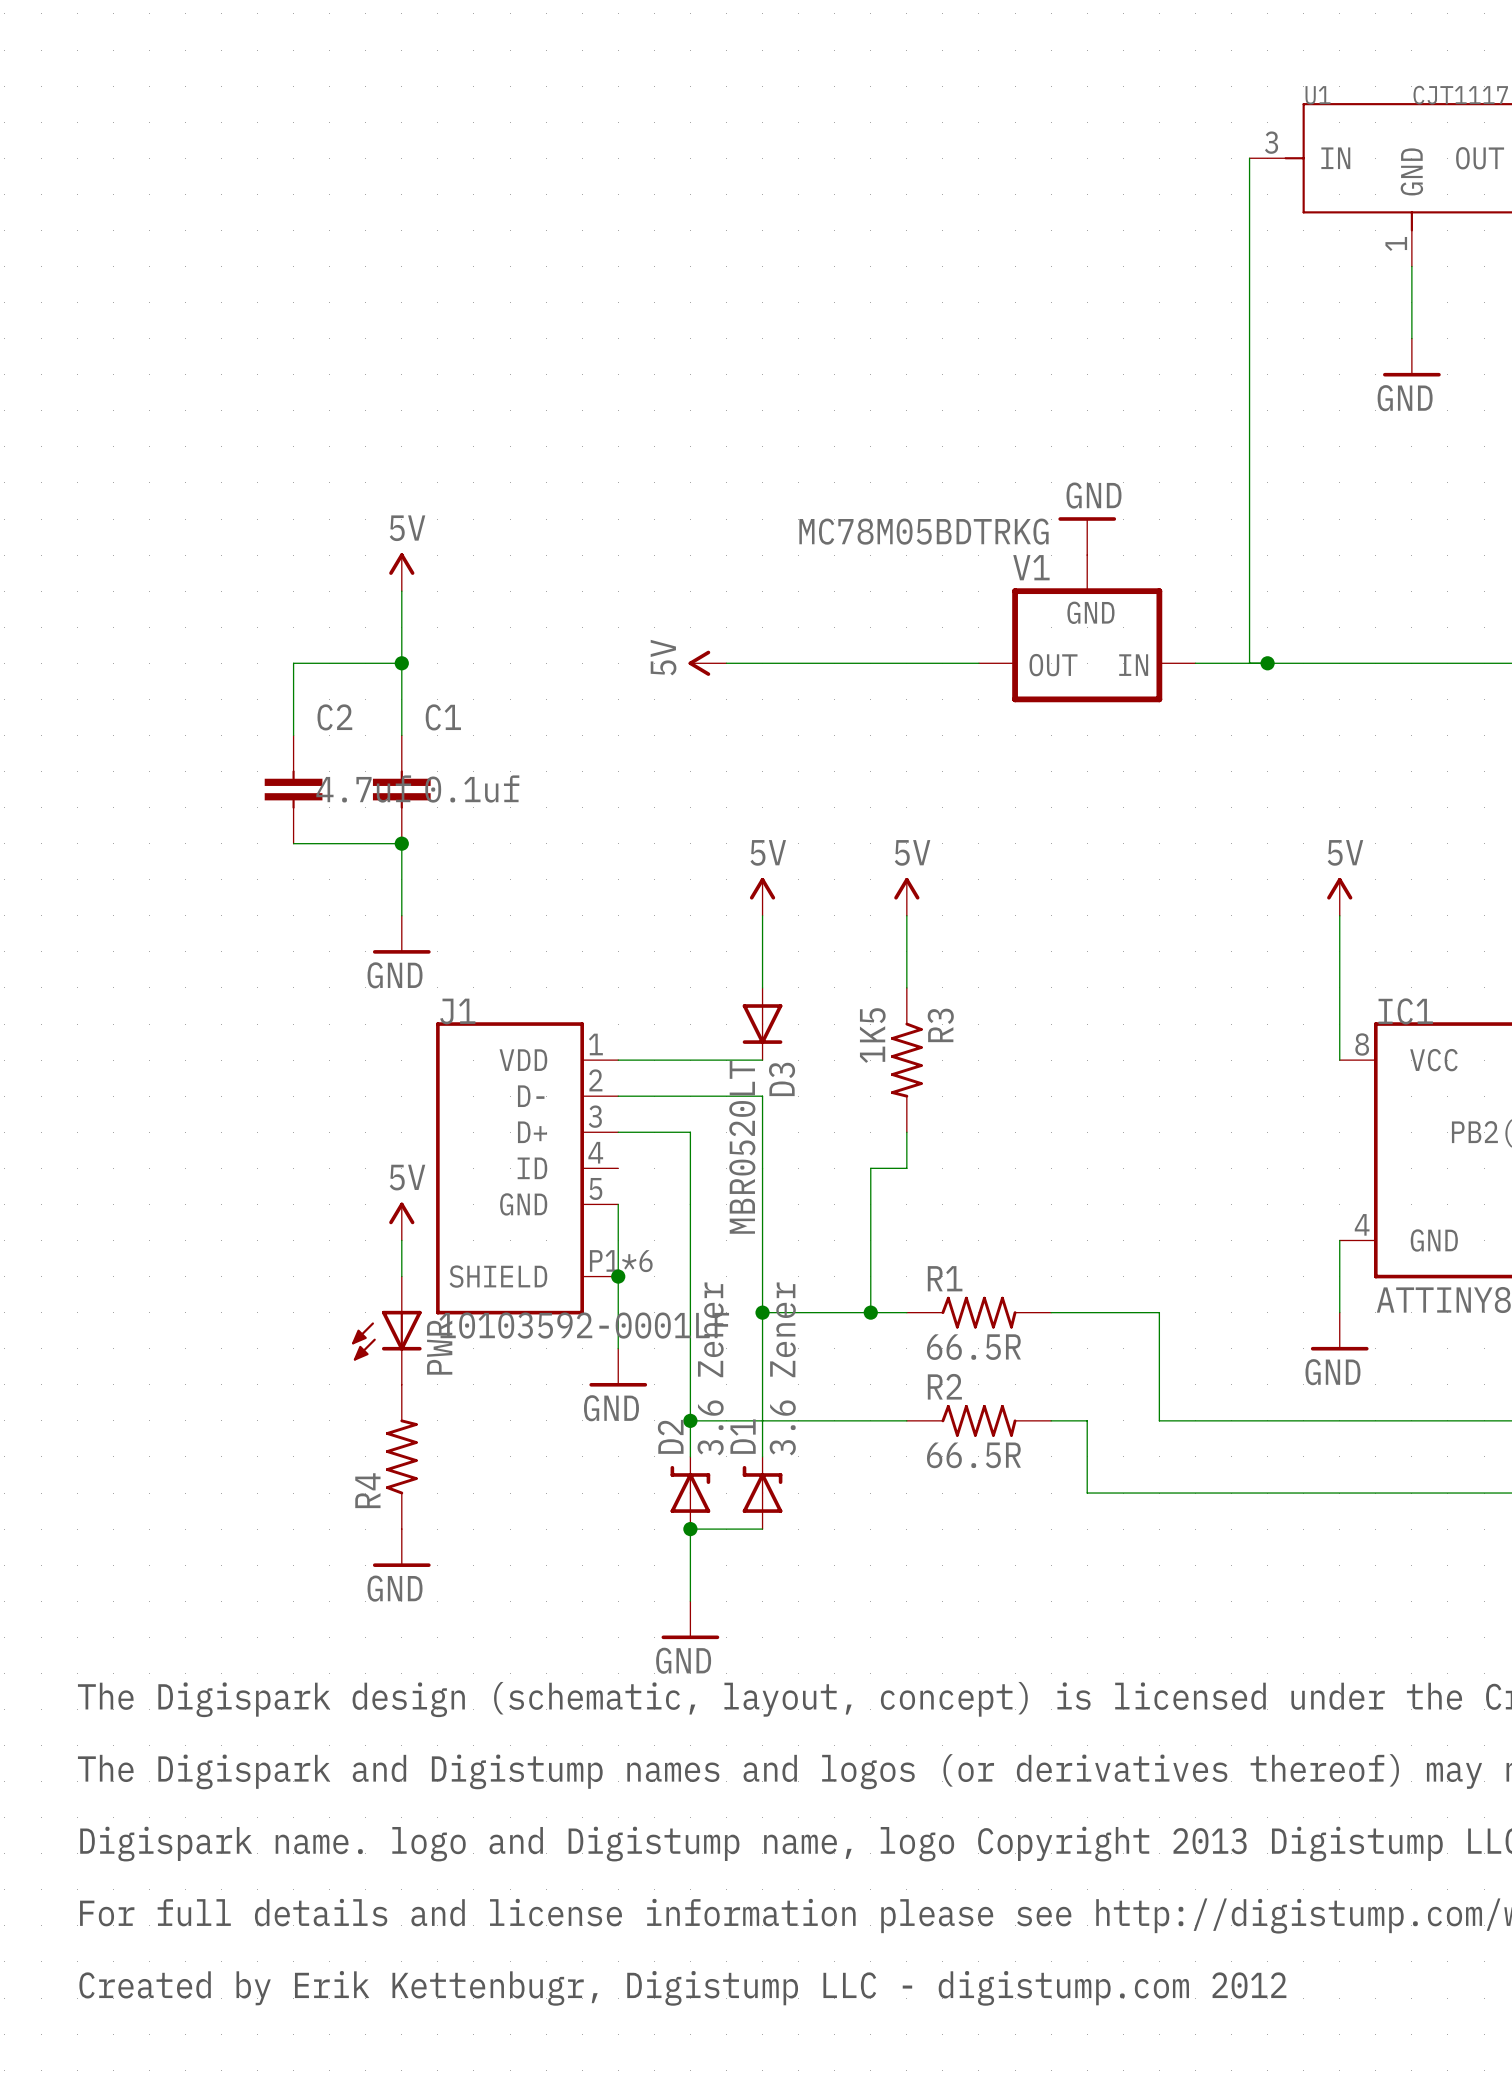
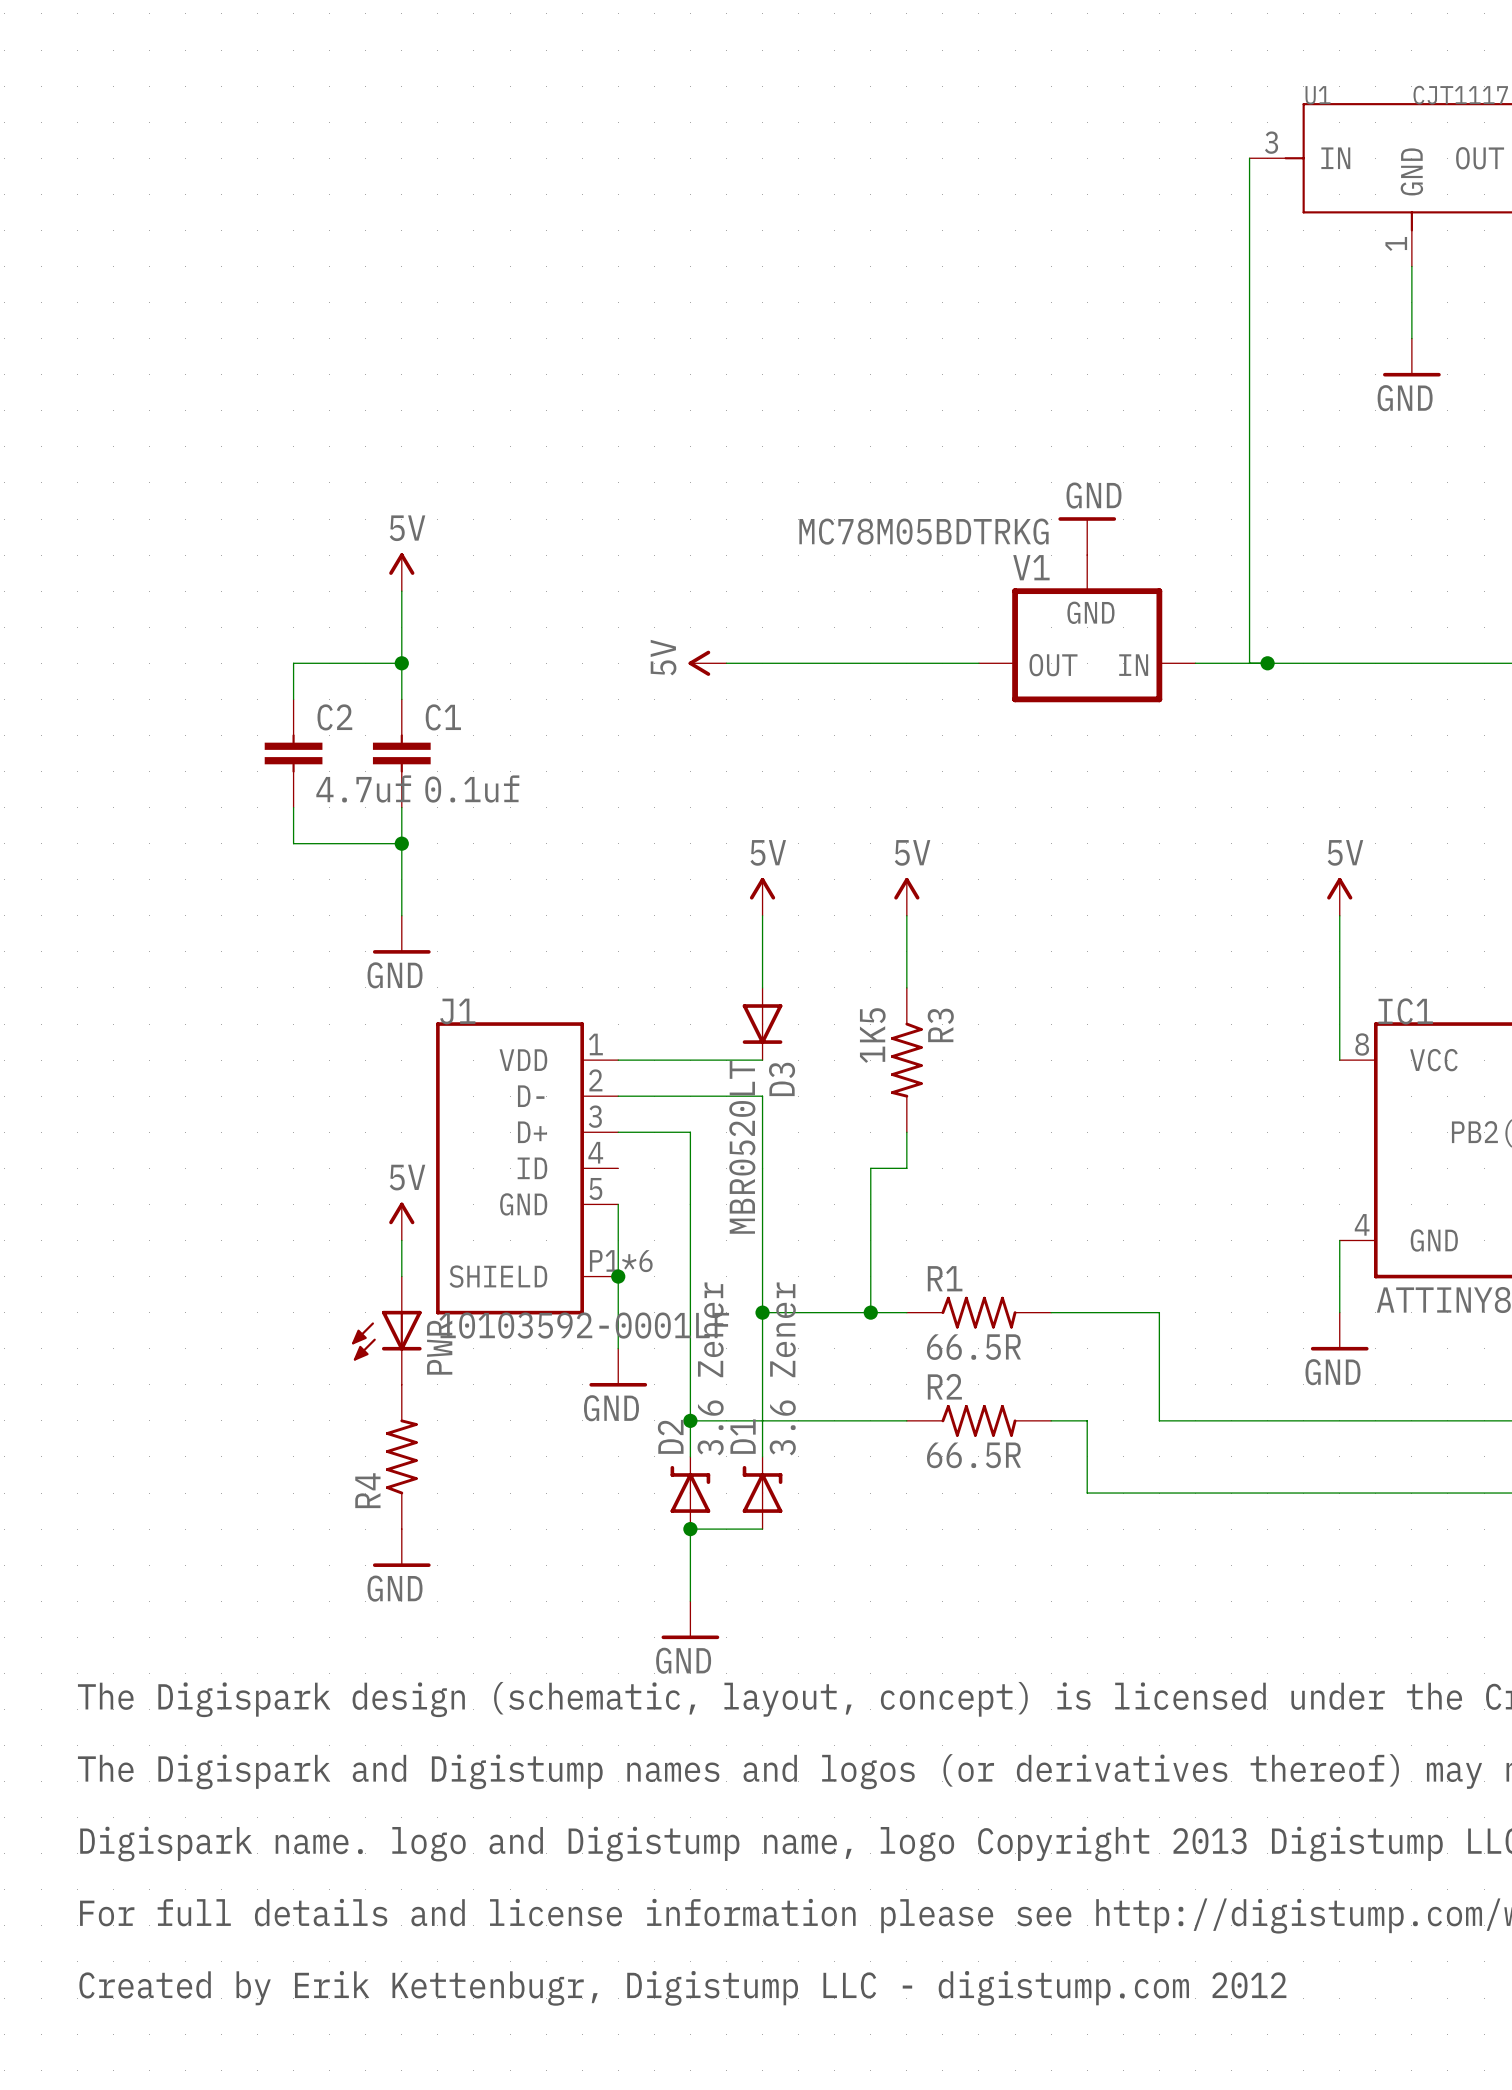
C2 position: (293, 789) -> (293, 753)
C1 position: (401, 789) -> (401, 753)

